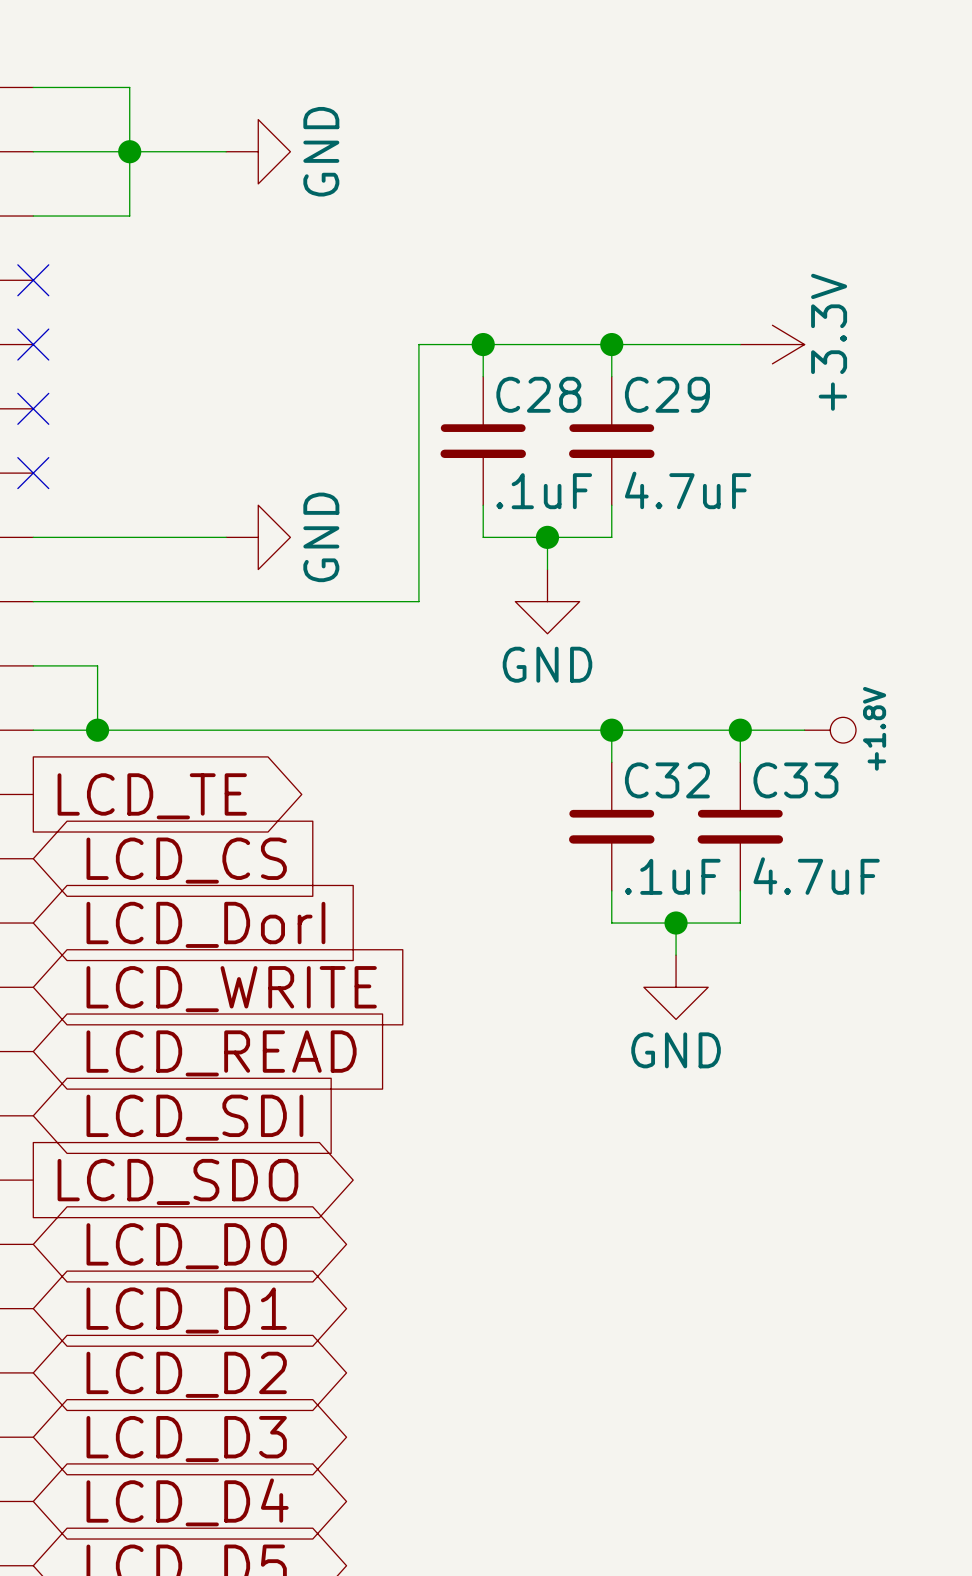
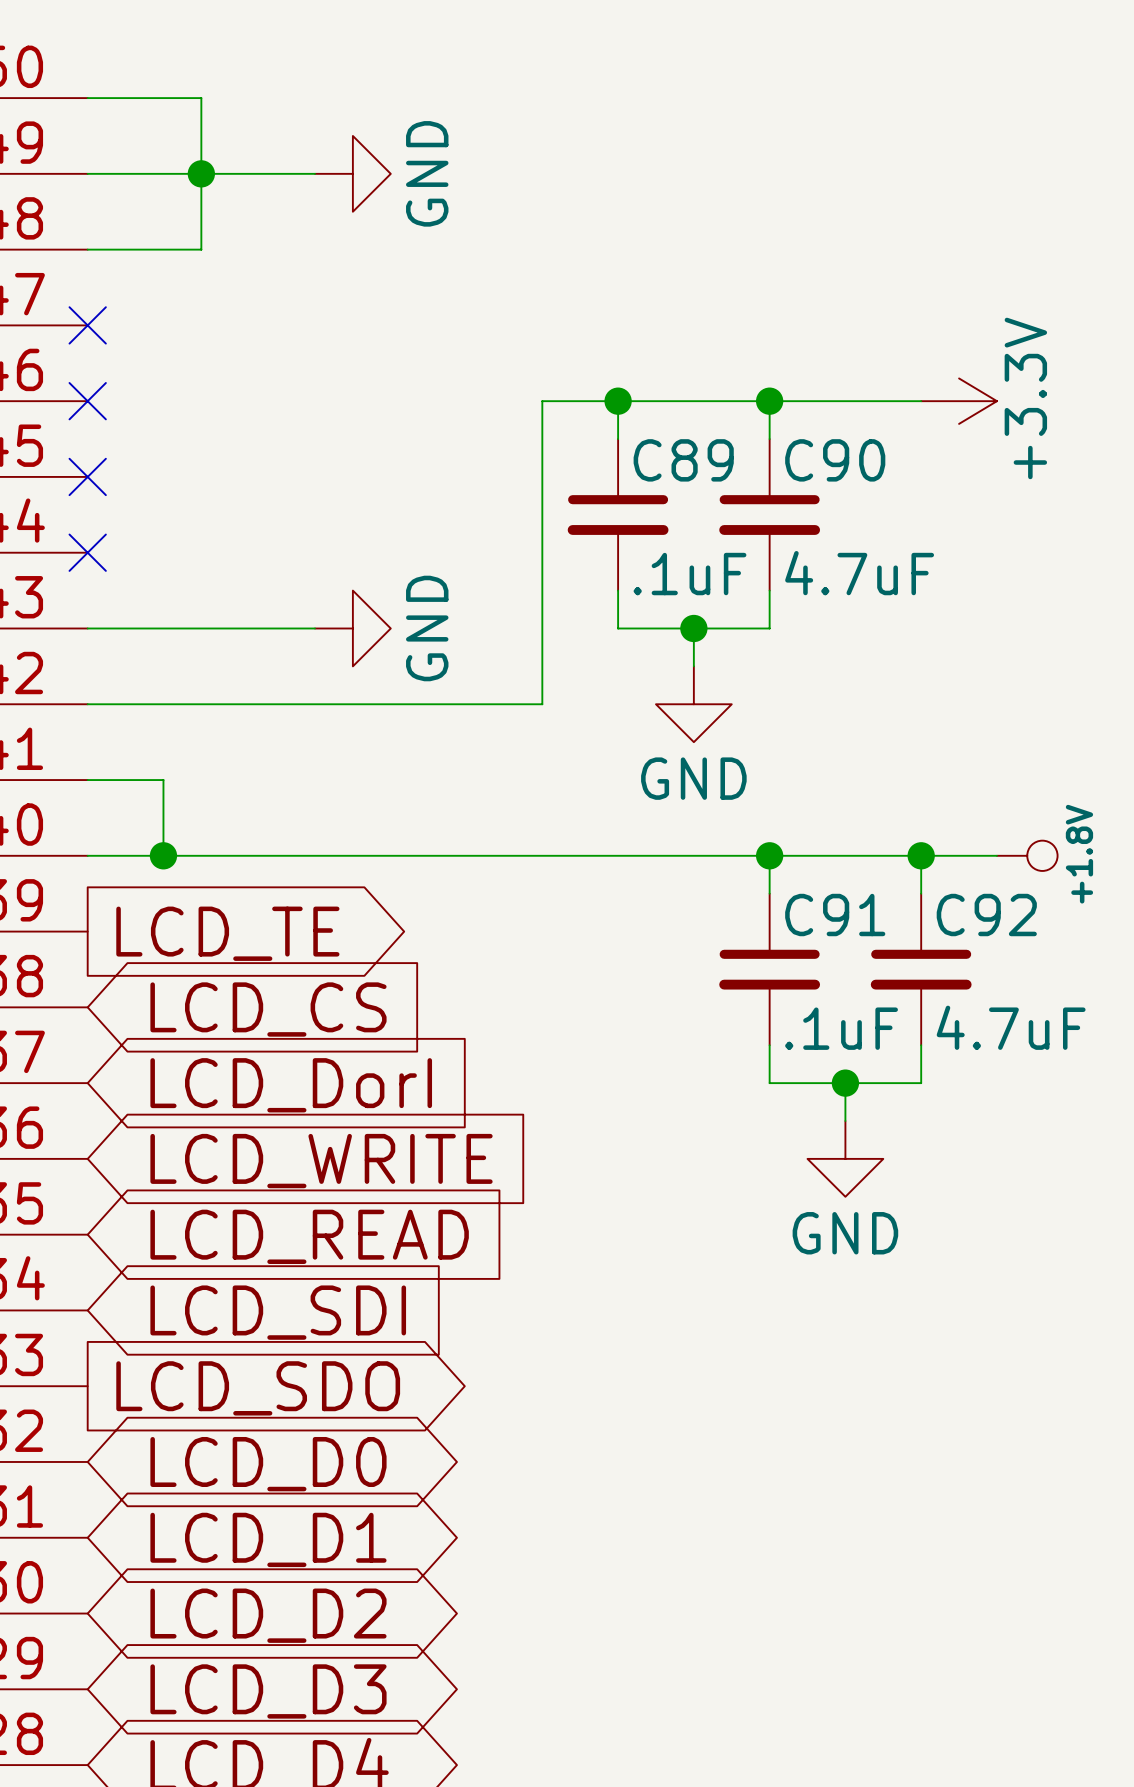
C28 name: C28 (538, 394) -> C89 (683, 460)
C29 name: C29 (667, 394) -> C90 (835, 460)
C32 name: C32 (667, 780) -> C91 (835, 915)
C33 name: C33 (795, 780) -> C92 (986, 915)

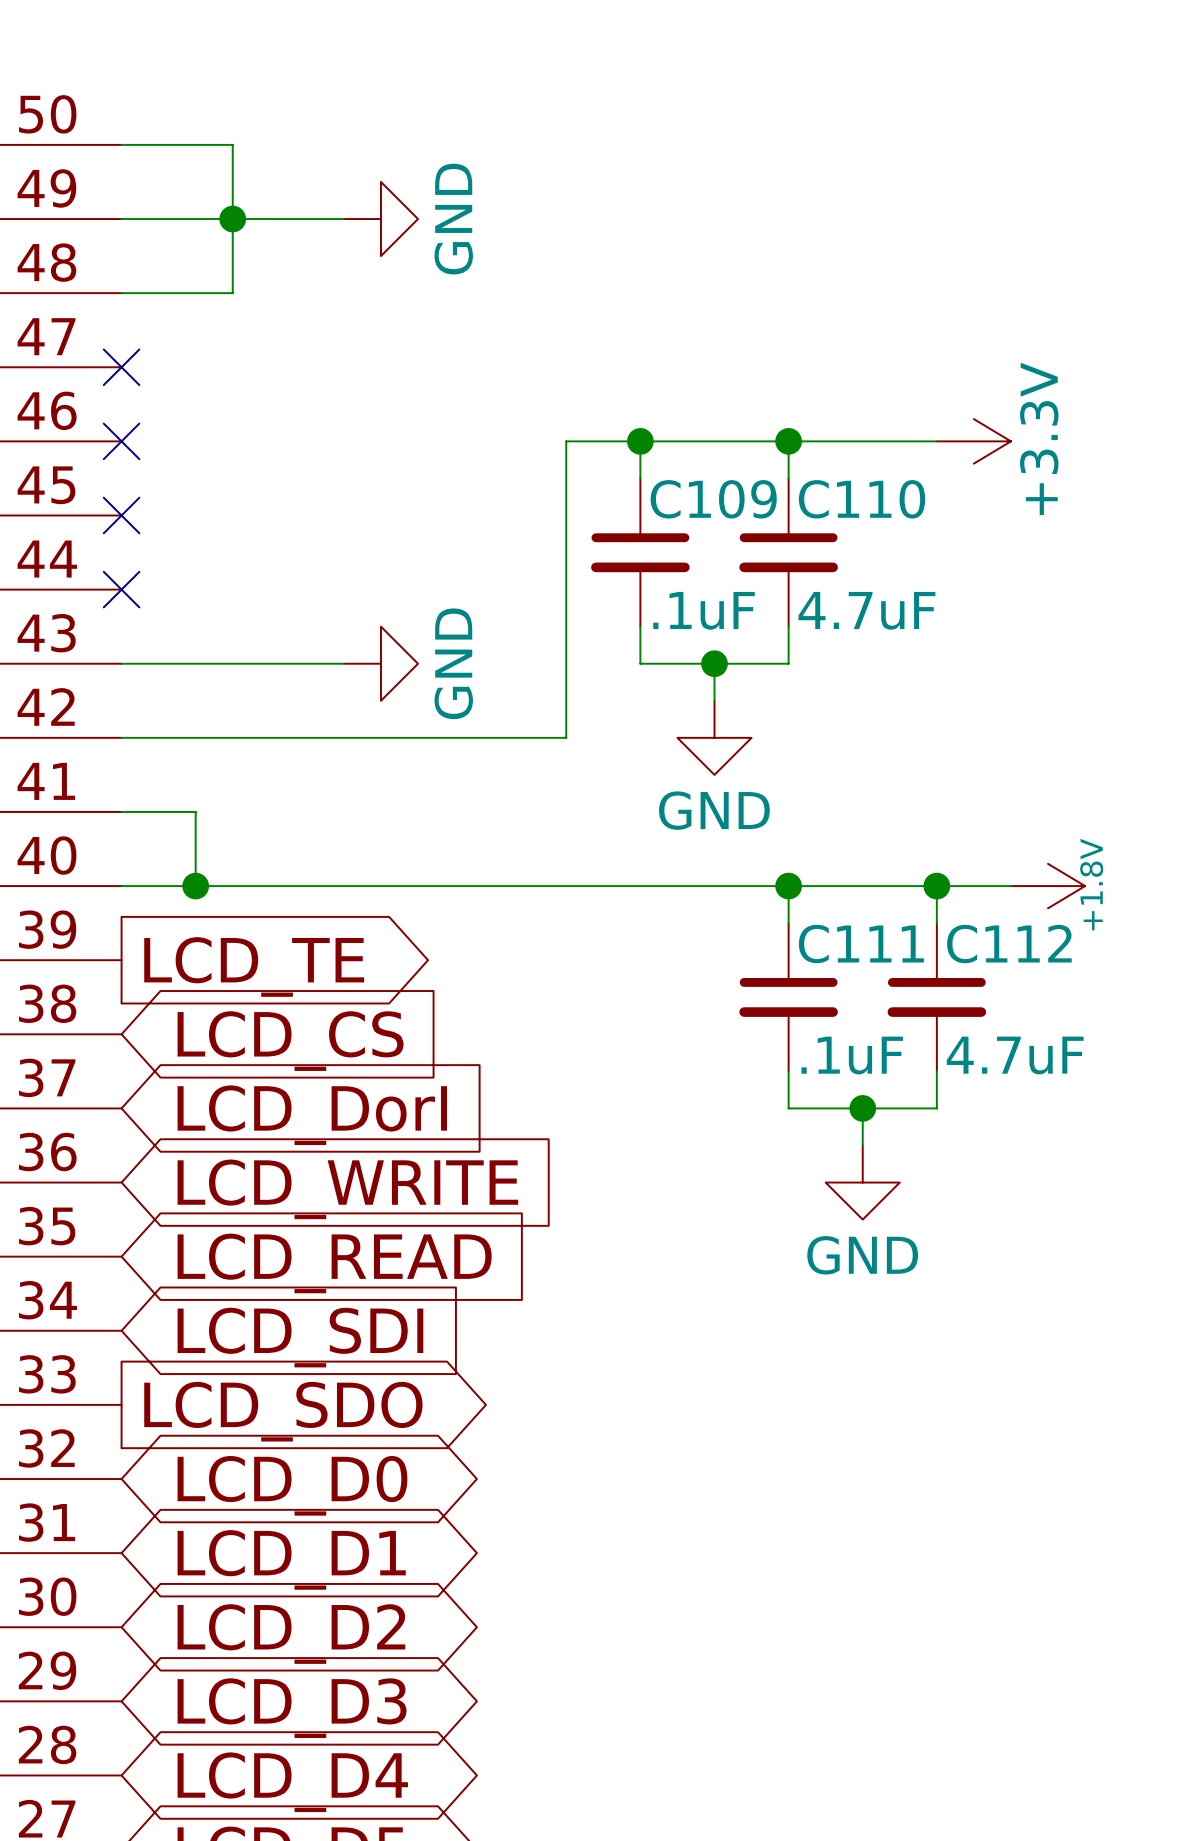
C89 name: C89 (683, 460) -> C109 (713, 499)
C90 name: C90 (835, 460) -> C110 (862, 499)
power symbol shape: [996, 840, 1058, 871] -> [1010, 863, 1086, 909]
C91 name: C91 (835, 915) -> C111 (861, 944)
C92 name: C92 (986, 915) -> C112 (1009, 944)

